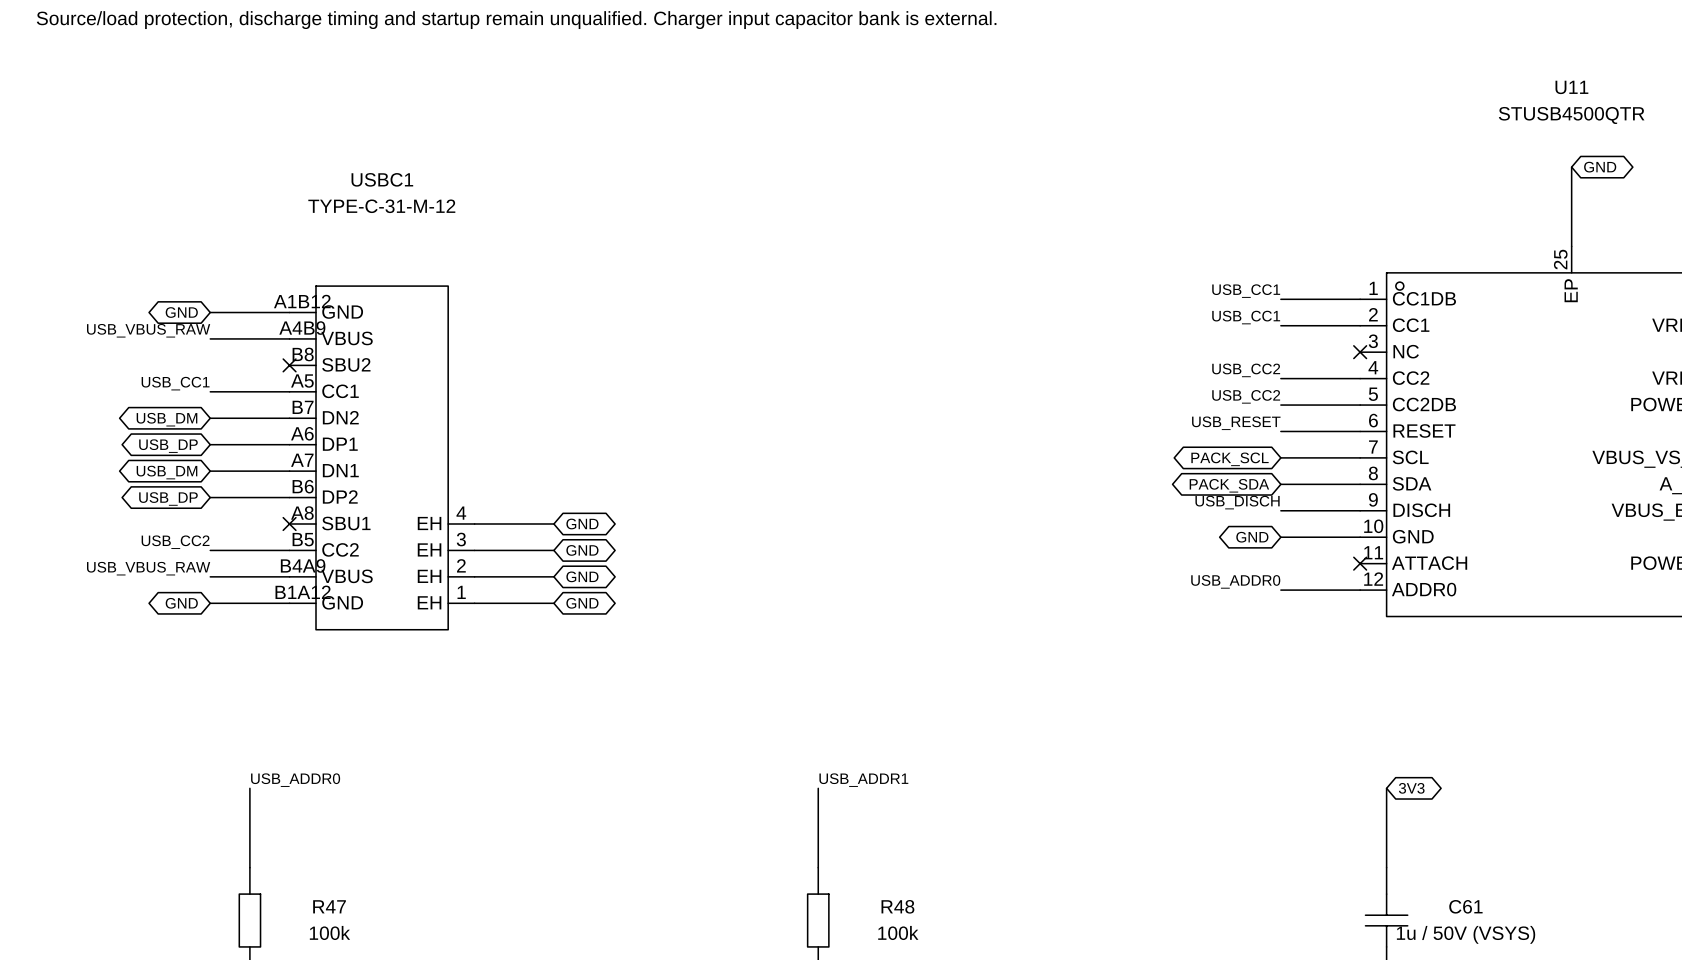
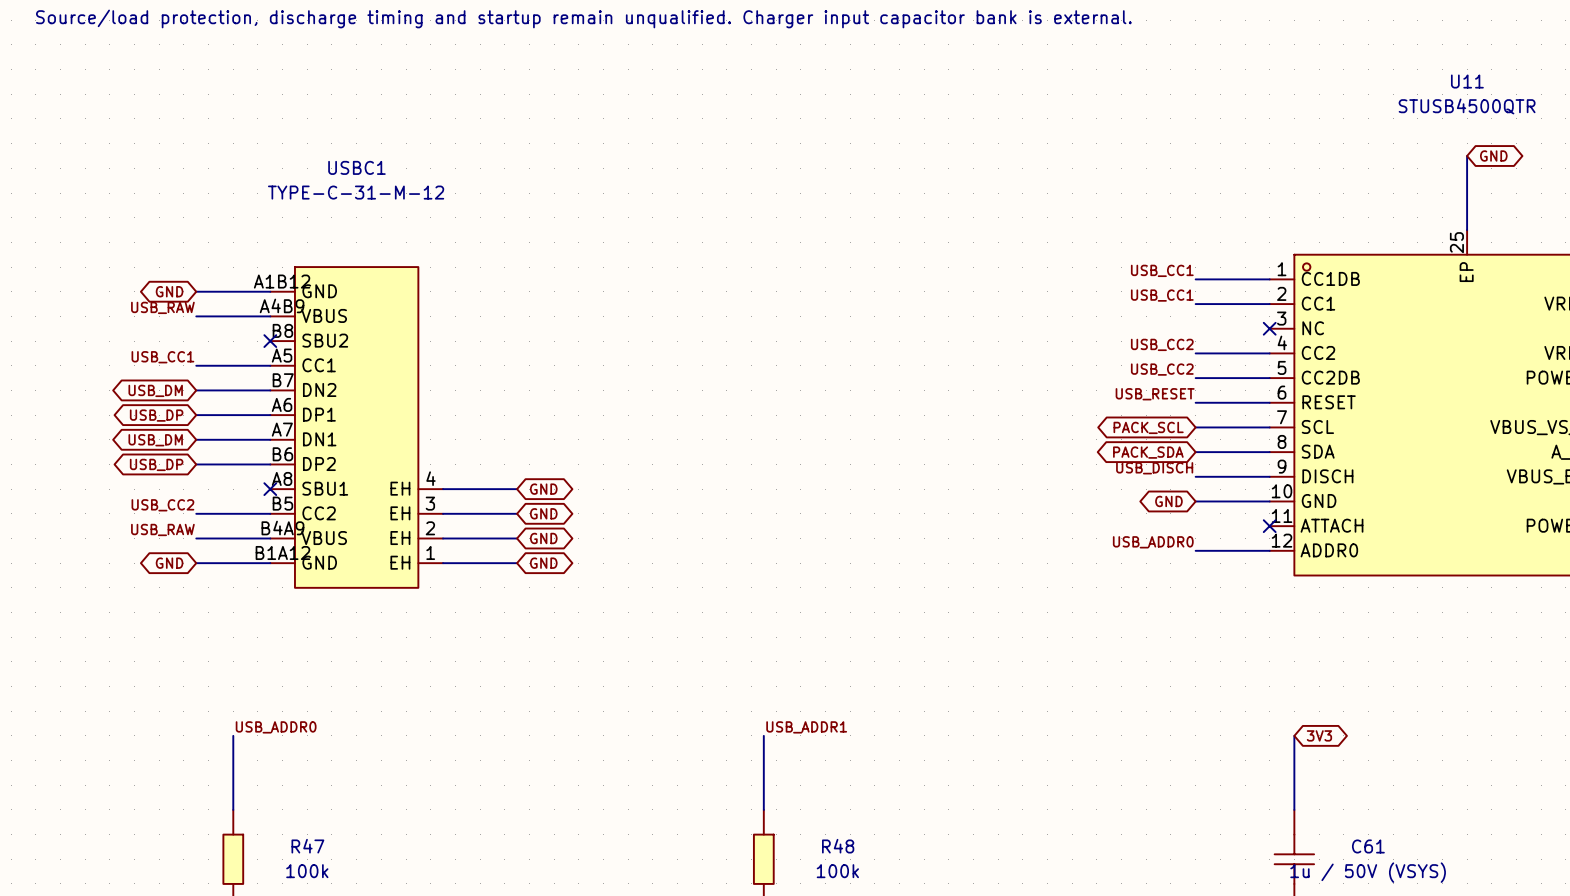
label: USB_VBUS_RAW (148, 330) -> USB_RAW (162, 307)
label: USB_VBUS_RAW (148, 568) -> USB_RAW (162, 529)

